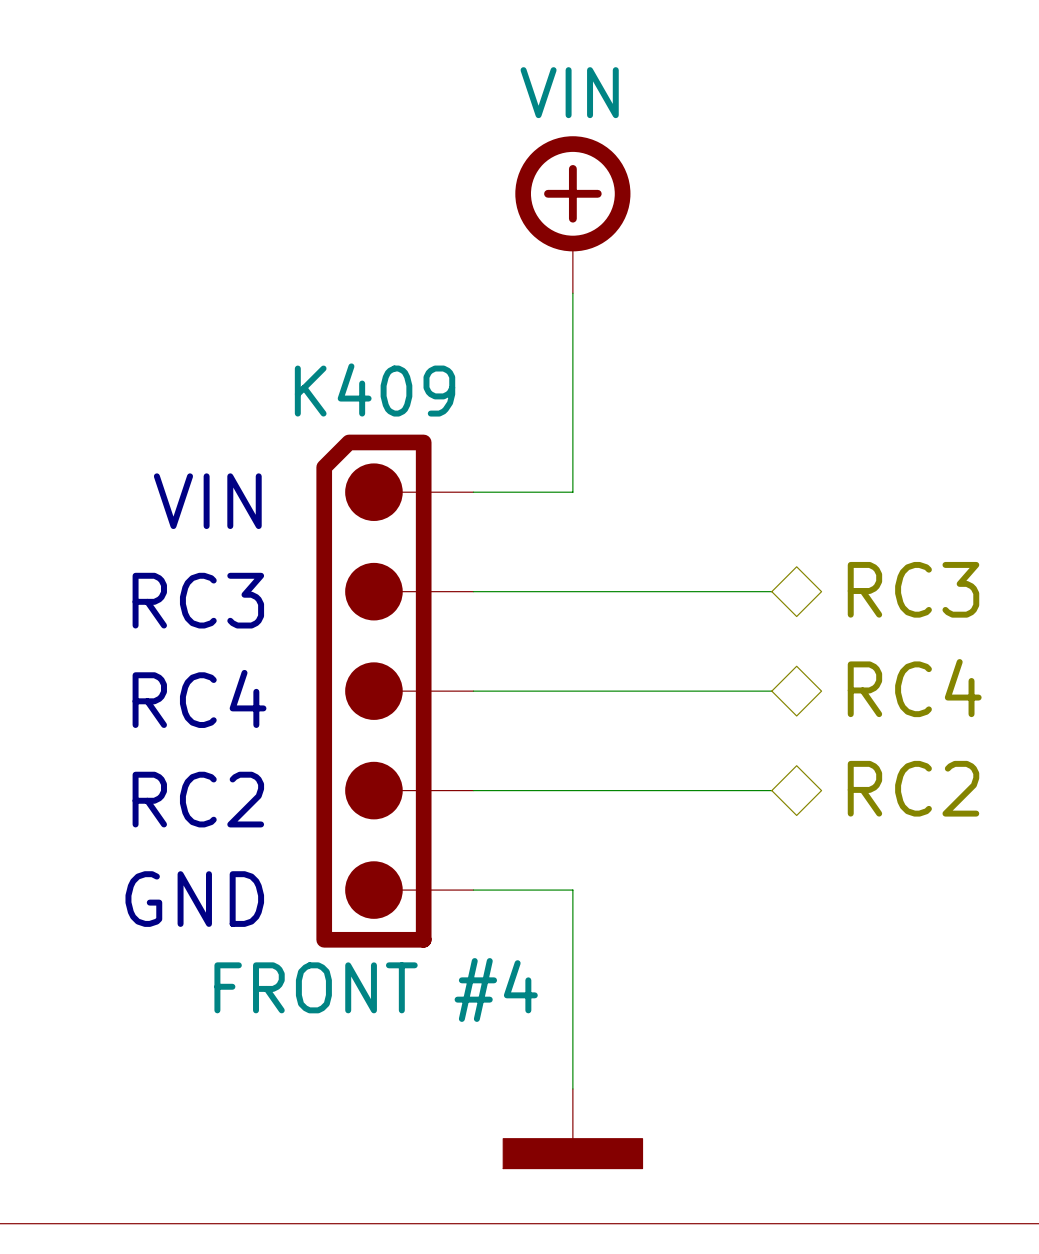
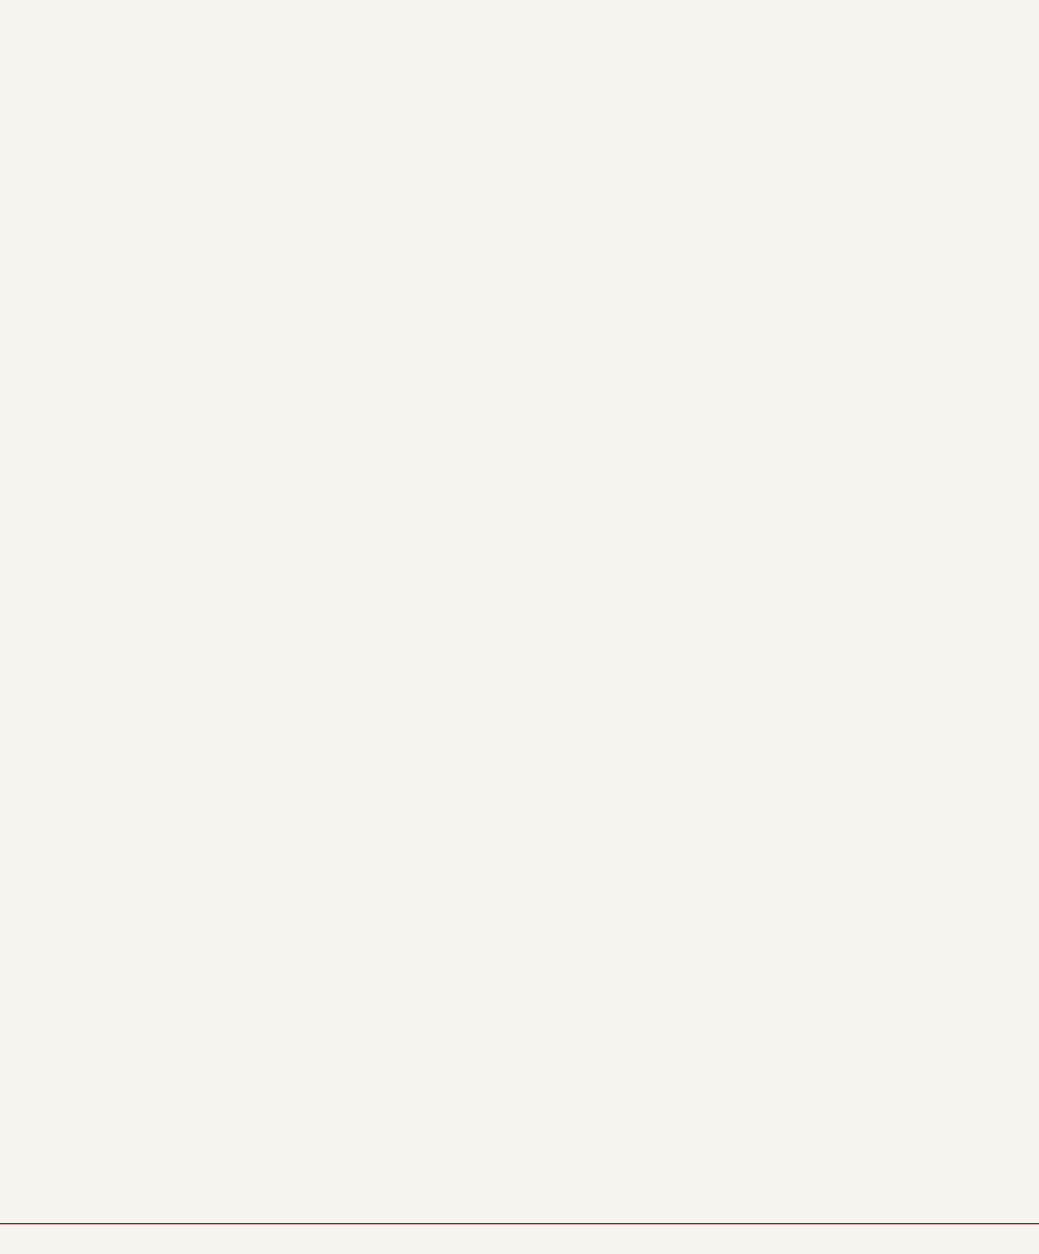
power symbol: (572, 214) -> none
wire: (572, 293) (572, 492) (473, 492) -> none
text: VIN (207, 501) -> none
hierarchical label: RC3 (913, 589) -> none
wire: (473, 591) (771, 591) -> none
text: RC3 (198, 600) -> none
hierarchical label: RC4 (914, 688) -> none
K409: FRONT #4 (394, 691) -> none
wire: (473, 691) (771, 691) -> none
text: RC4 (199, 698) -> none
hierarchical label: RC2 (913, 788) -> none
wire: (473, 790) (771, 790) -> none
text: RC2 (198, 799) -> none
wire: (473, 890) (572, 890) (572, 1088) -> none
text: GND (194, 899) -> none
power symbol: (572, 1128) -> none

